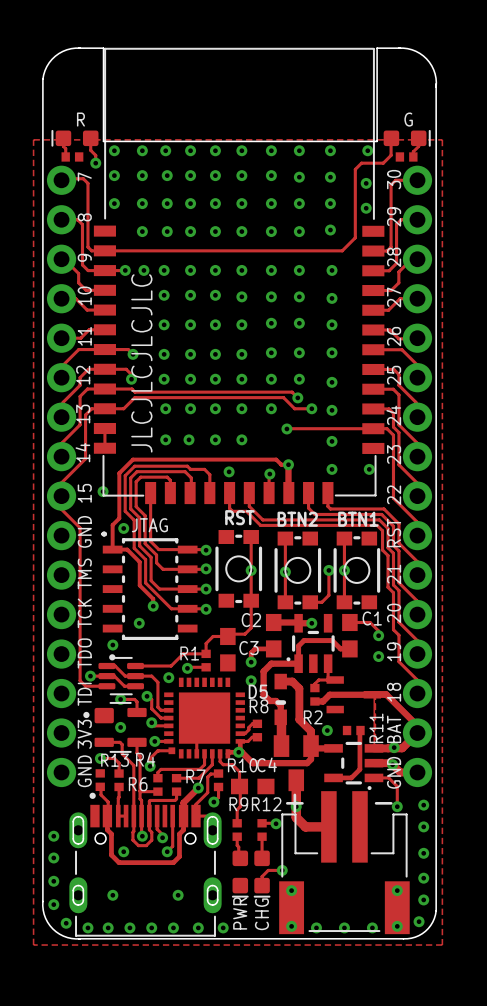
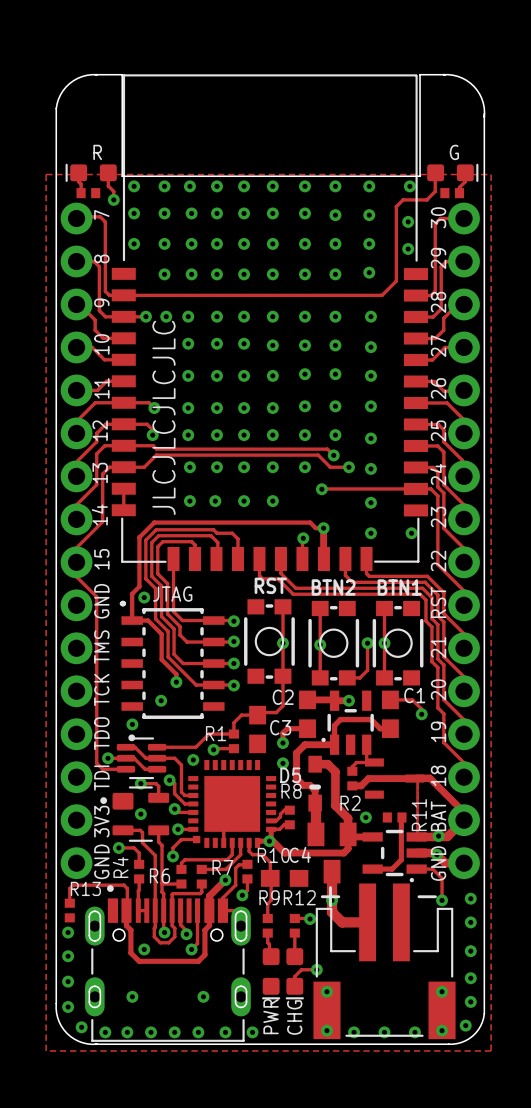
via: (229, 471) -> none
via: (103, 491) -> none
via: (378, 656) -> none
R4 name rotation: 0° (145, 759) -> 90° counterclockwise (120, 867)
R4 name position: R4 (145, 759) -> R4 (120, 867)
R13 position: (100, 780) -> (69, 910)
track: (100, 786) (101, 794) (108, 802) -> (69, 903) (69, 888) (73, 885) (123, 885) (127, 888) (127, 895)

